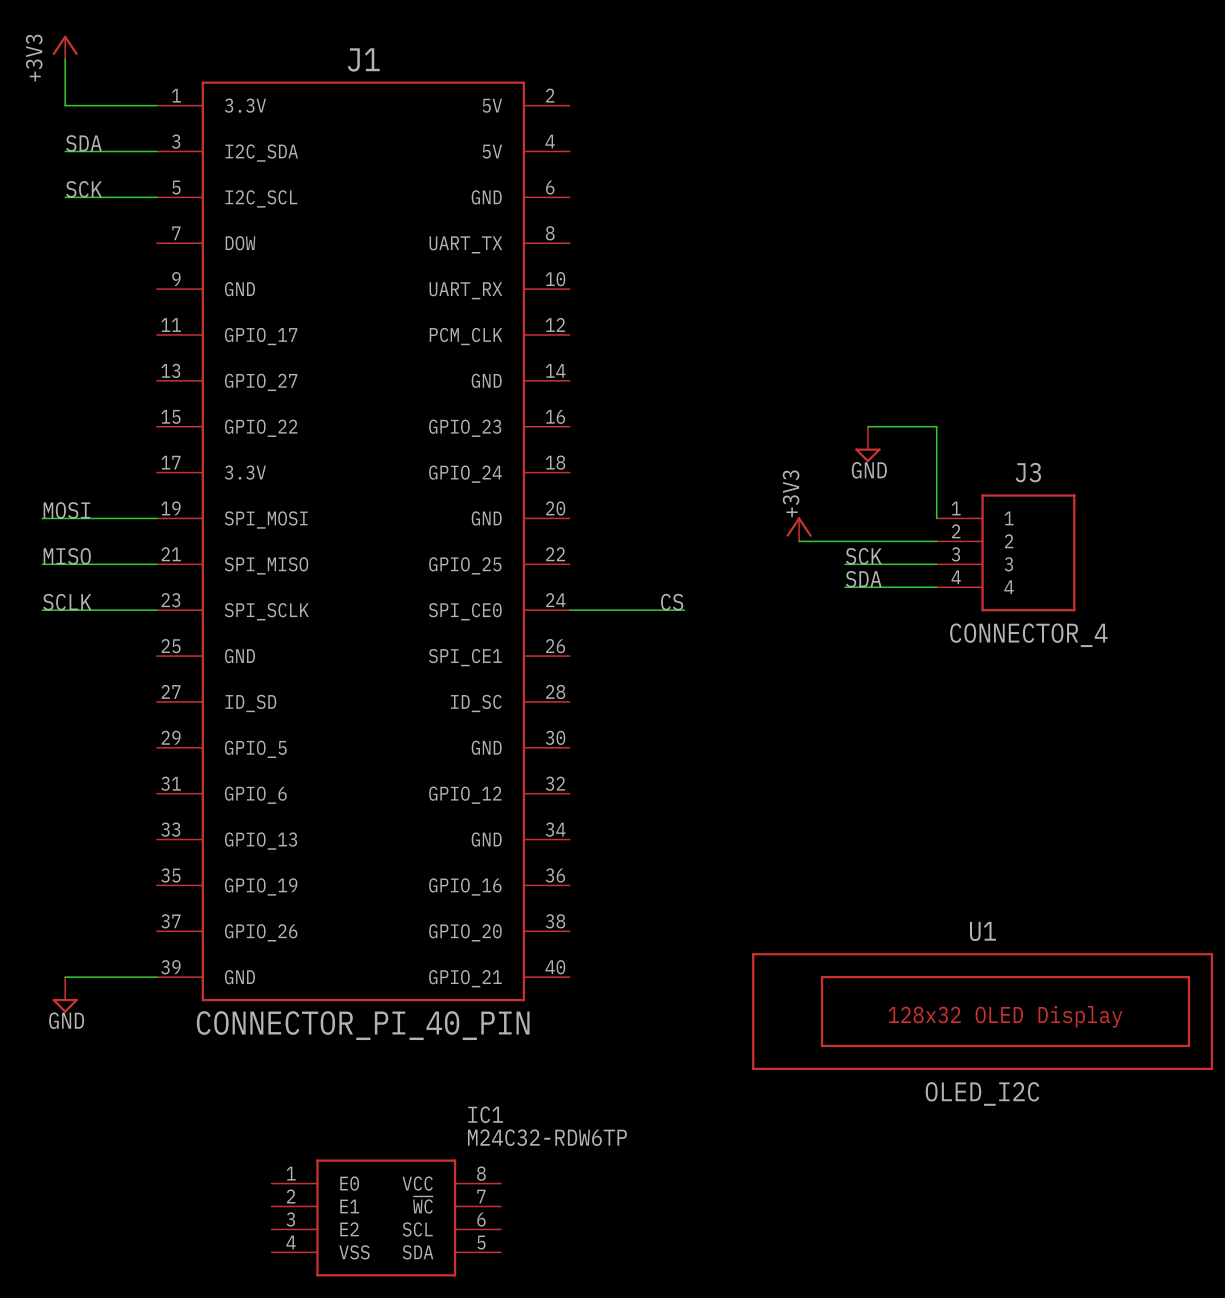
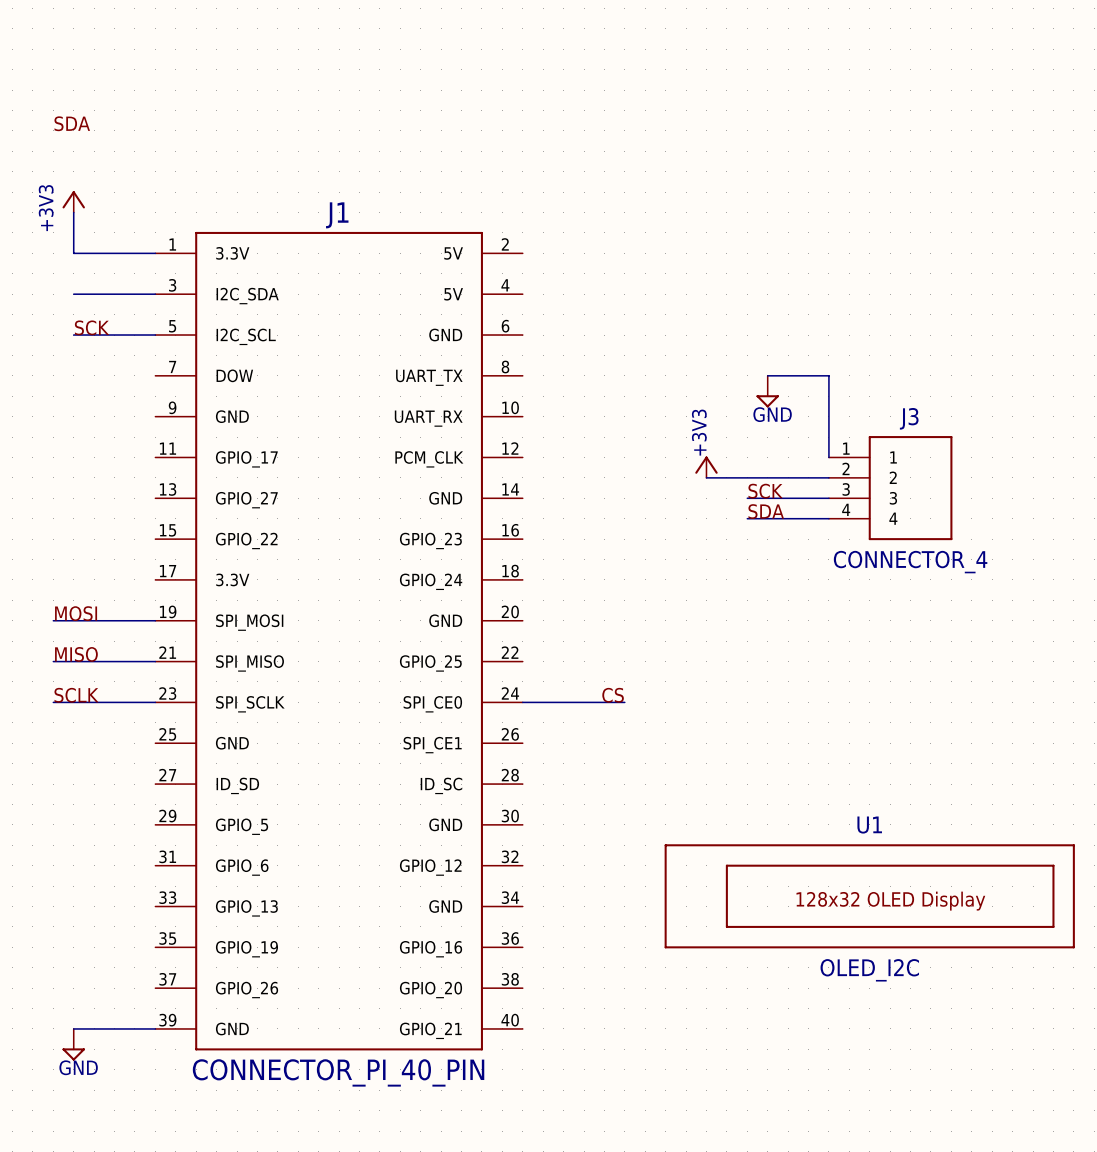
power symbol position: +3V3 (65, 47) -> +3V3 (73, 201)
wire: (65, 59) (65, 105) (156, 105) -> (73, 212) (73, 253) (155, 253)
wire: (65, 151) (156, 151) -> (73, 294) (155, 294)
label position: SCK (84, 189) -> SCK (92, 327)
wire: (65, 197) (156, 197) -> (73, 335) (155, 335)
label position: MOSI (66, 510) -> MOSI (76, 613)
wire: (42, 518) (156, 518) -> (53, 620) (155, 620)
J1 position: (363, 541) -> (339, 641)
label position: MISO (67, 556) -> MISO (76, 654)
wire: (42, 564) (156, 564) -> (53, 661) (155, 661)
label position: SCLK (67, 602) -> SCLK (76, 695)
label position: CS (672, 602) -> CS (613, 695)
wire: (42, 610) (156, 610) -> (53, 702) (155, 702)
wire: (569, 610) (684, 610) -> (522, 702) (624, 702)
wire: (65, 977) (156, 977) -> (73, 1028) (155, 1028)
power symbol position: GND (65, 994) -> GND (73, 1044)
IC1: M24C32-RDW6TP (386, 1217) -> none

